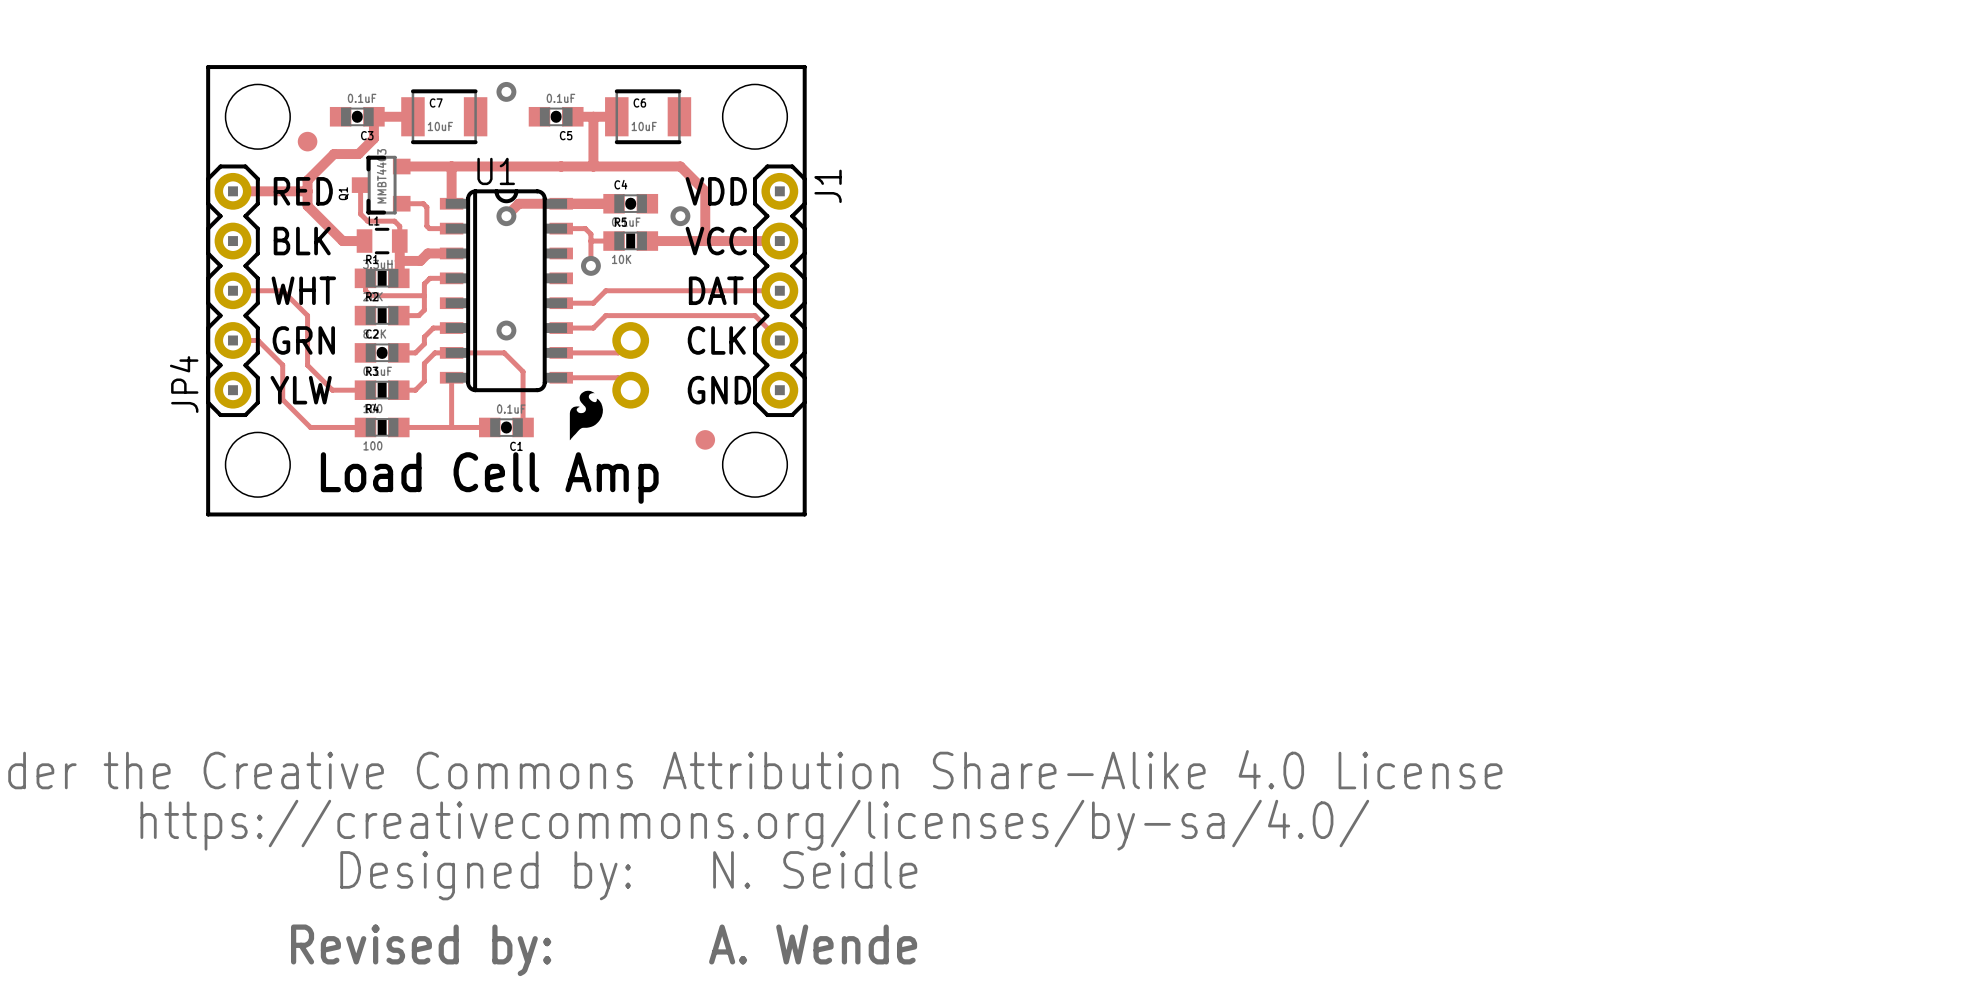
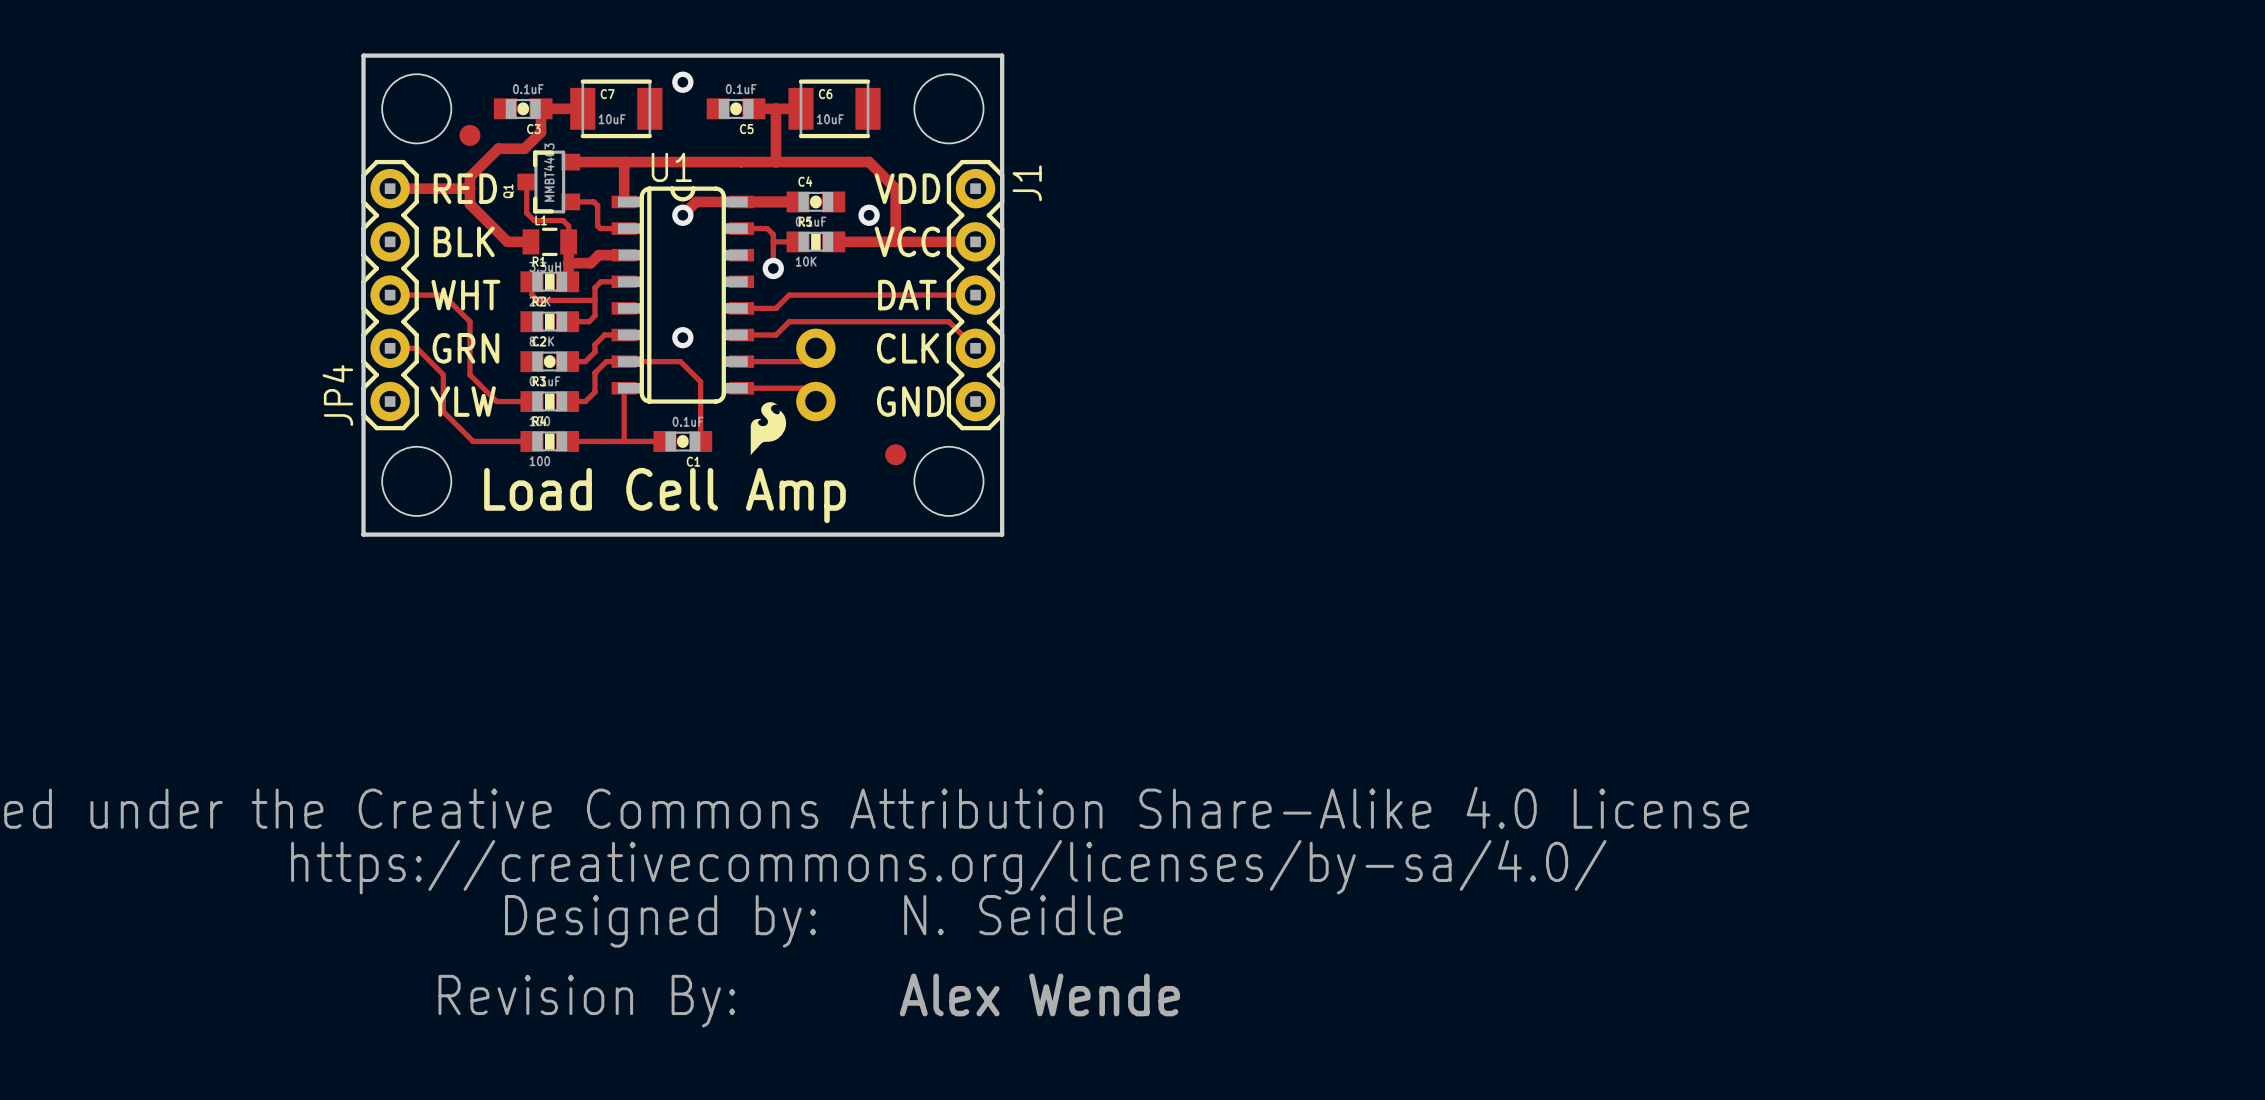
drawing: none -> [438, 974, 736, 1028]
text: A. Wende (813, 944) -> Alex Wende (1039, 994)
text: Revised by: (421, 950) -> none

